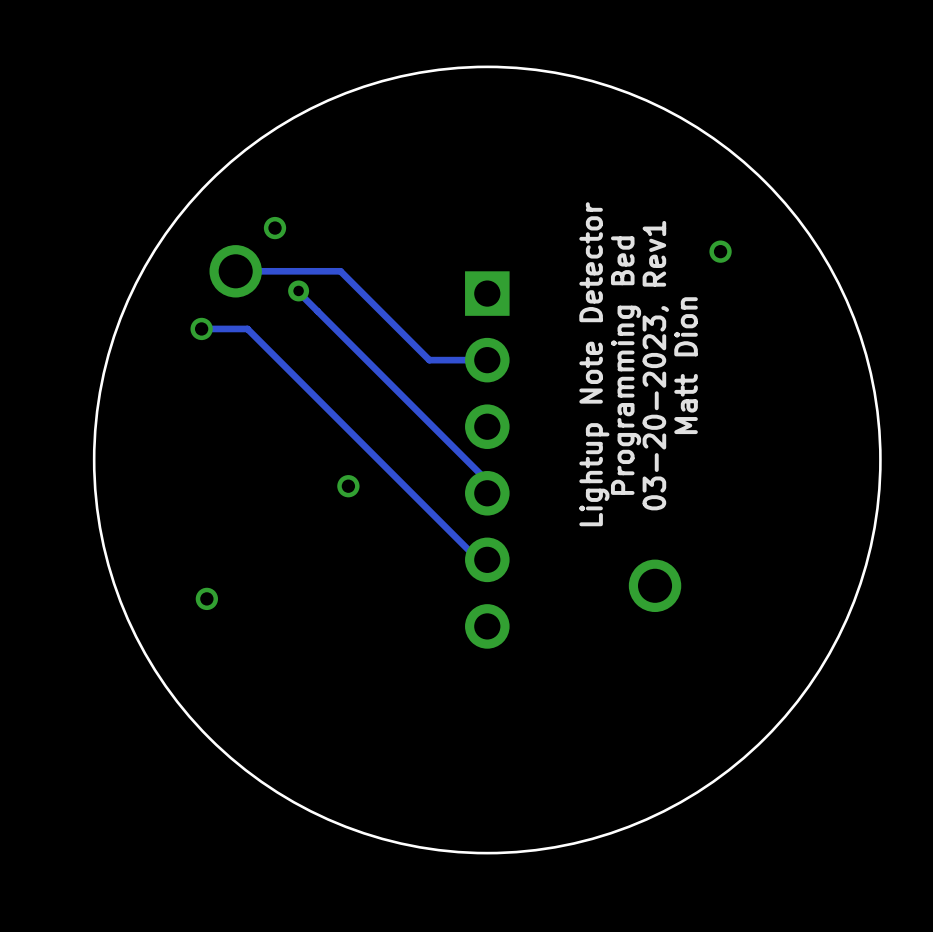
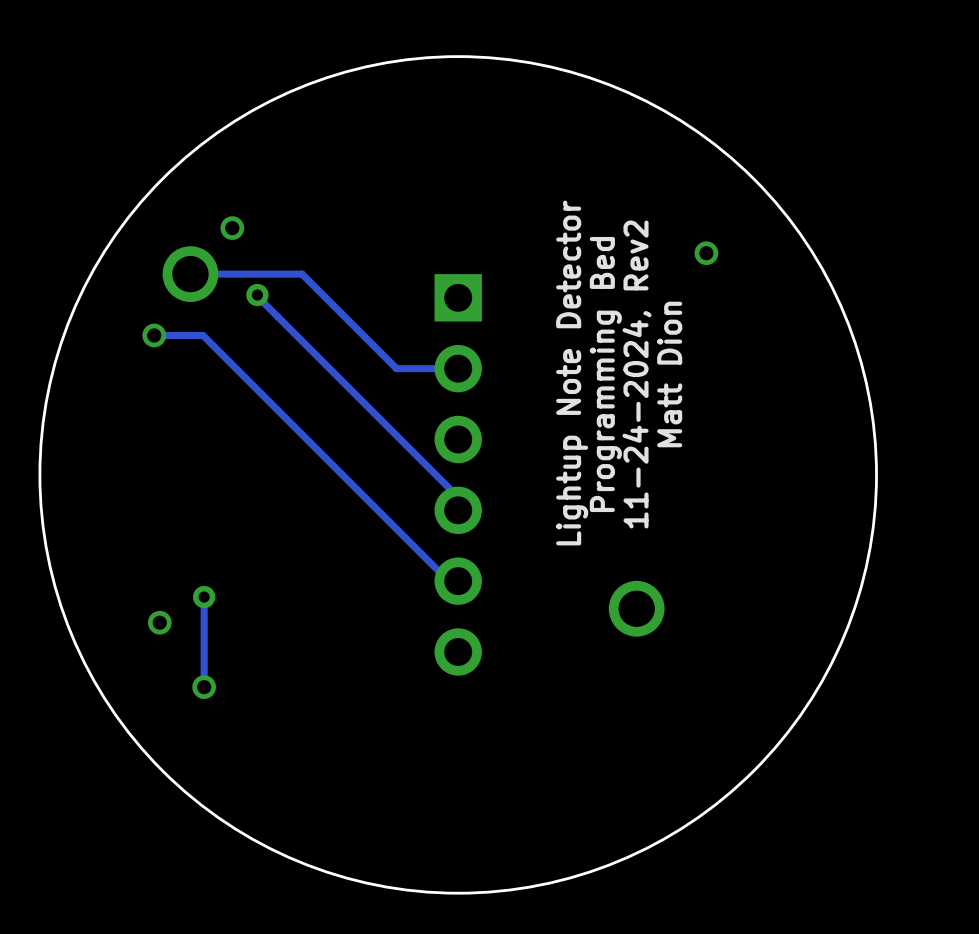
text: 03-20-2023, Rev1 (655, 365) -> 11-24-2024, Rev2 (637, 374)
part position: (348, 486) -> (204, 687)
track: none -> (204, 597) (204, 687)
via: none -> (204, 597)

